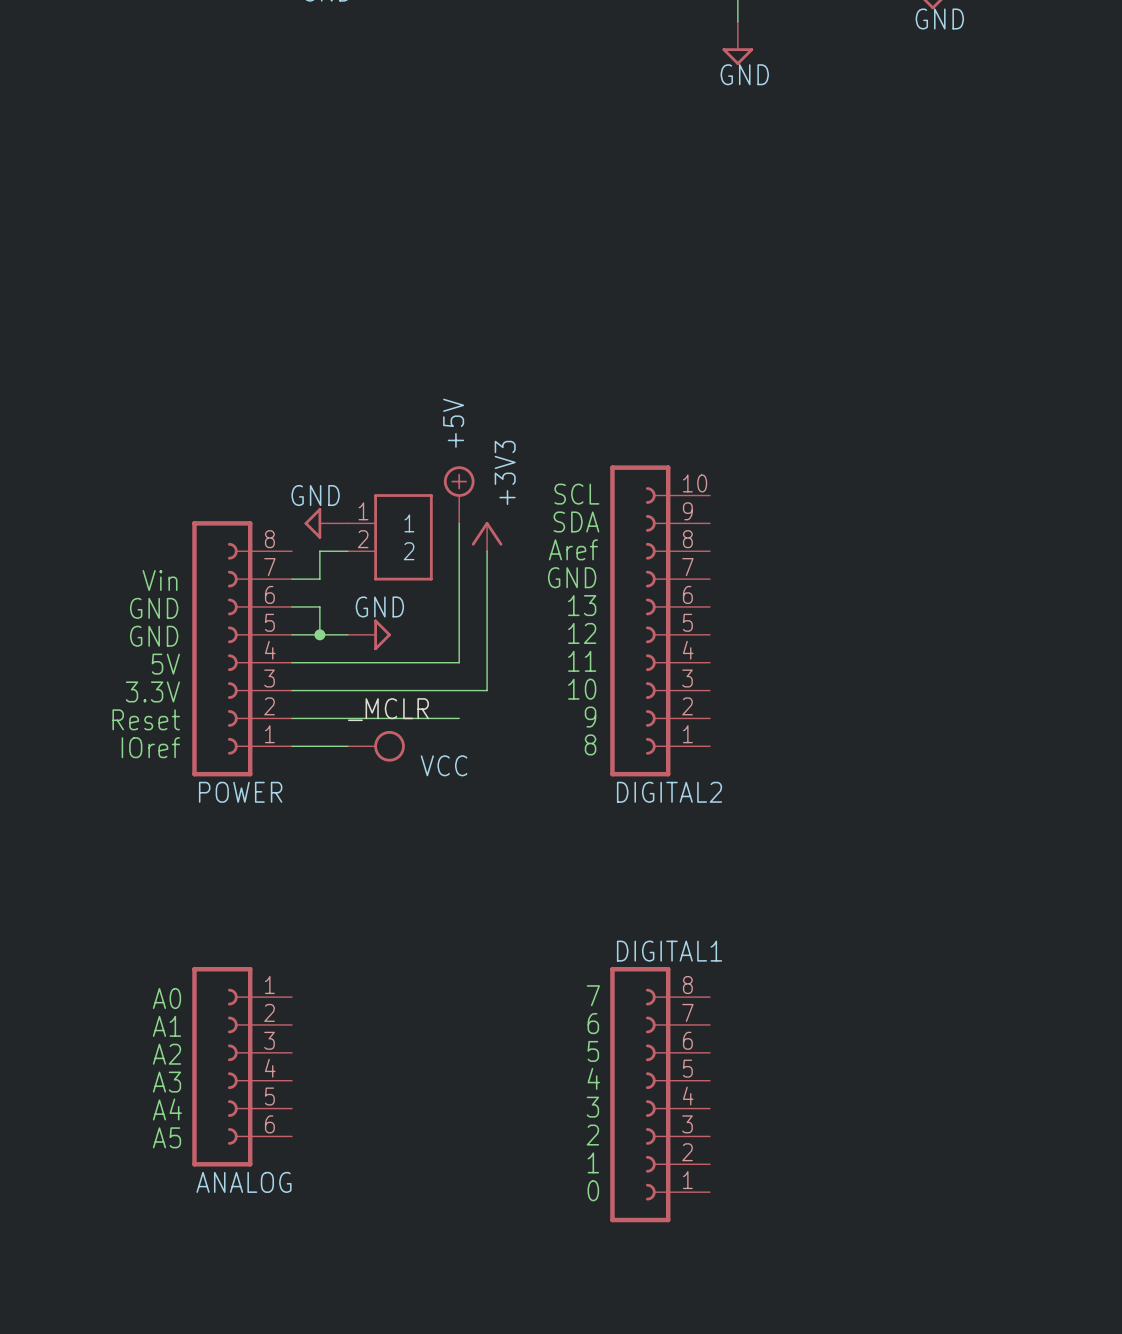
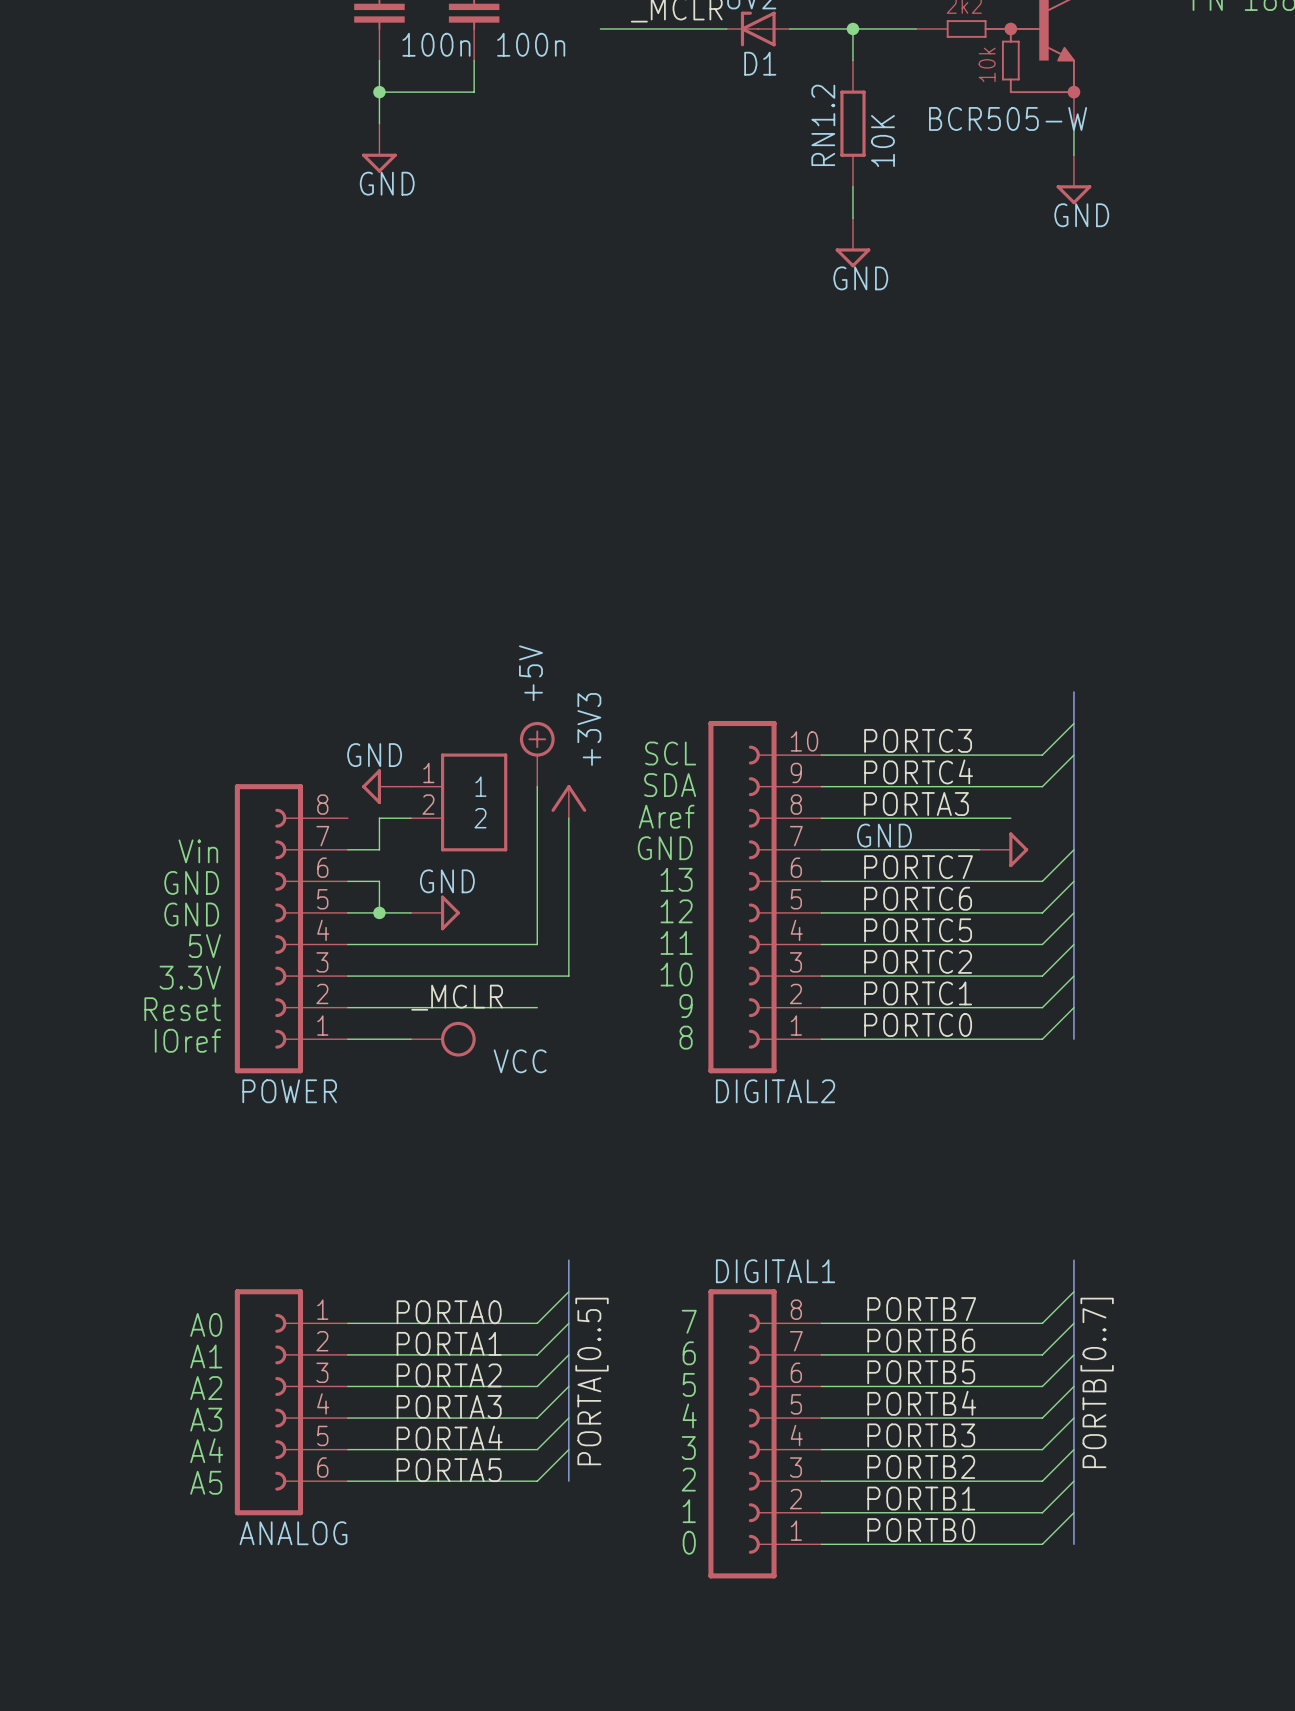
bus: none -> (1073, 691) (1073, 1039)
wire: none -> (1073, 723) (1042, 755) (821, 755)
label: none -> PORTC3 (918, 740)
wire: none -> (1073, 755) (1042, 786) (821, 786)
label: none -> PORTC4 (918, 771)
label: none -> PORTA3 (916, 804)
wire: none -> (821, 818) (1010, 818)
wire: none -> (821, 849) (979, 849)
power symbol: none -> GND (1003, 849)
wire: none -> (1073, 849) (1042, 881) (821, 881)
label: none -> PORTC7 (918, 867)
wire: none -> (1073, 881) (1042, 912) (821, 912)
label: none -> PORTC6 (918, 898)
wire: none -> (1073, 912) (1042, 944) (821, 944)
label: none -> PORTC5 (918, 930)
wire: none -> (1073, 944) (1042, 976) (821, 976)
label: none -> PORTC2 (918, 961)
wire: none -> (1073, 976) (1042, 1007) (821, 1007)
label: none -> PORTC1 (918, 993)
wire: none -> (1073, 1007) (1042, 1039) (821, 1039)
label: none -> PORTC0 (918, 1025)
bus: none -> (568, 1260) (568, 1481)
bus: none -> (1073, 1260) (1073, 1544)
wire: none -> (568, 1291) (537, 1323) (347, 1323)
wire: none -> (1073, 1291) (1042, 1323) (821, 1323)
label: none -> PORTB7 (921, 1309)
label: none -> PORTA0 (449, 1312)
wire: none -> (568, 1323) (537, 1354) (347, 1354)
wire: none -> (1073, 1323) (1042, 1354) (821, 1354)
label: none -> PORTB6 (921, 1340)
label: none -> PORTA1 (449, 1343)
wire: none -> (568, 1354) (537, 1386) (347, 1386)
wire: none -> (1073, 1354) (1042, 1386) (821, 1386)
label: none -> PORTB5 (921, 1372)
label: none -> PORTA2 (449, 1375)
label: none -> PORTA[0..5] (592, 1381)
label: none -> PORTB[0..7] (1097, 1382)
wire: none -> (568, 1386) (537, 1418) (347, 1418)
wire: none -> (1073, 1386) (1042, 1418) (821, 1418)
label: none -> PORTB4 (921, 1403)
label: none -> PORTA3 (449, 1406)
wire: none -> (568, 1418) (537, 1449) (347, 1449)
wire: none -> (1073, 1418) (1042, 1449) (821, 1449)
label: none -> PORTB3 (921, 1435)
label: none -> PORTA4 (449, 1438)
wire: none -> (568, 1449) (537, 1481) (347, 1481)
wire: none -> (1073, 1449) (1042, 1481) (821, 1481)
label: none -> PORTB2 (921, 1466)
label: none -> PORTA5 (449, 1470)
wire: none -> (1073, 1481) (1042, 1512) (821, 1512)
label: none -> PORTB1 (921, 1498)
wire: none -> (1073, 1512) (1042, 1544) (821, 1544)
label: none -> PORTB0 (921, 1530)

